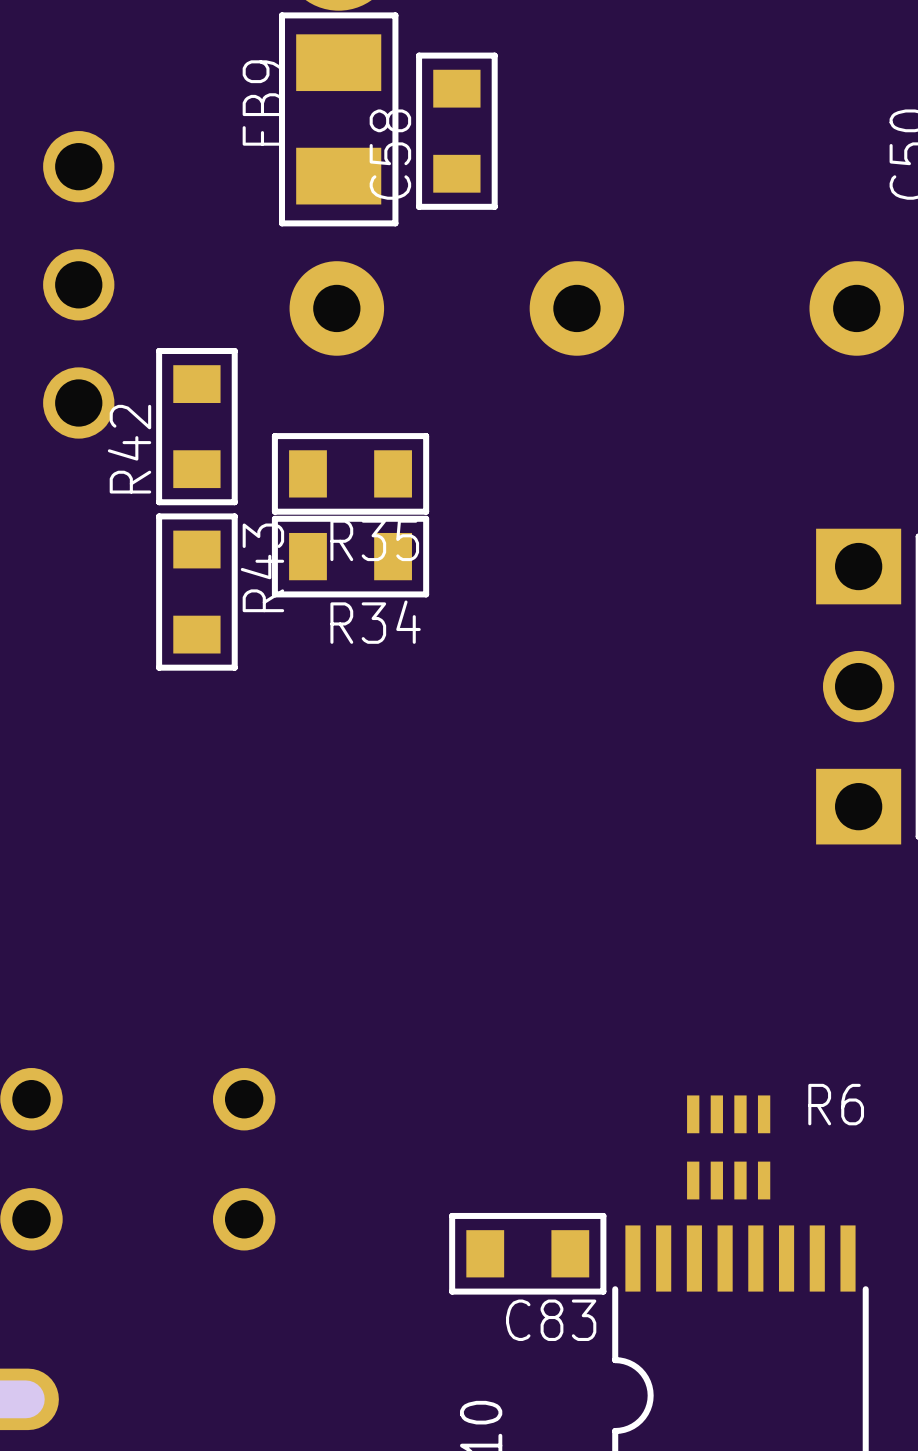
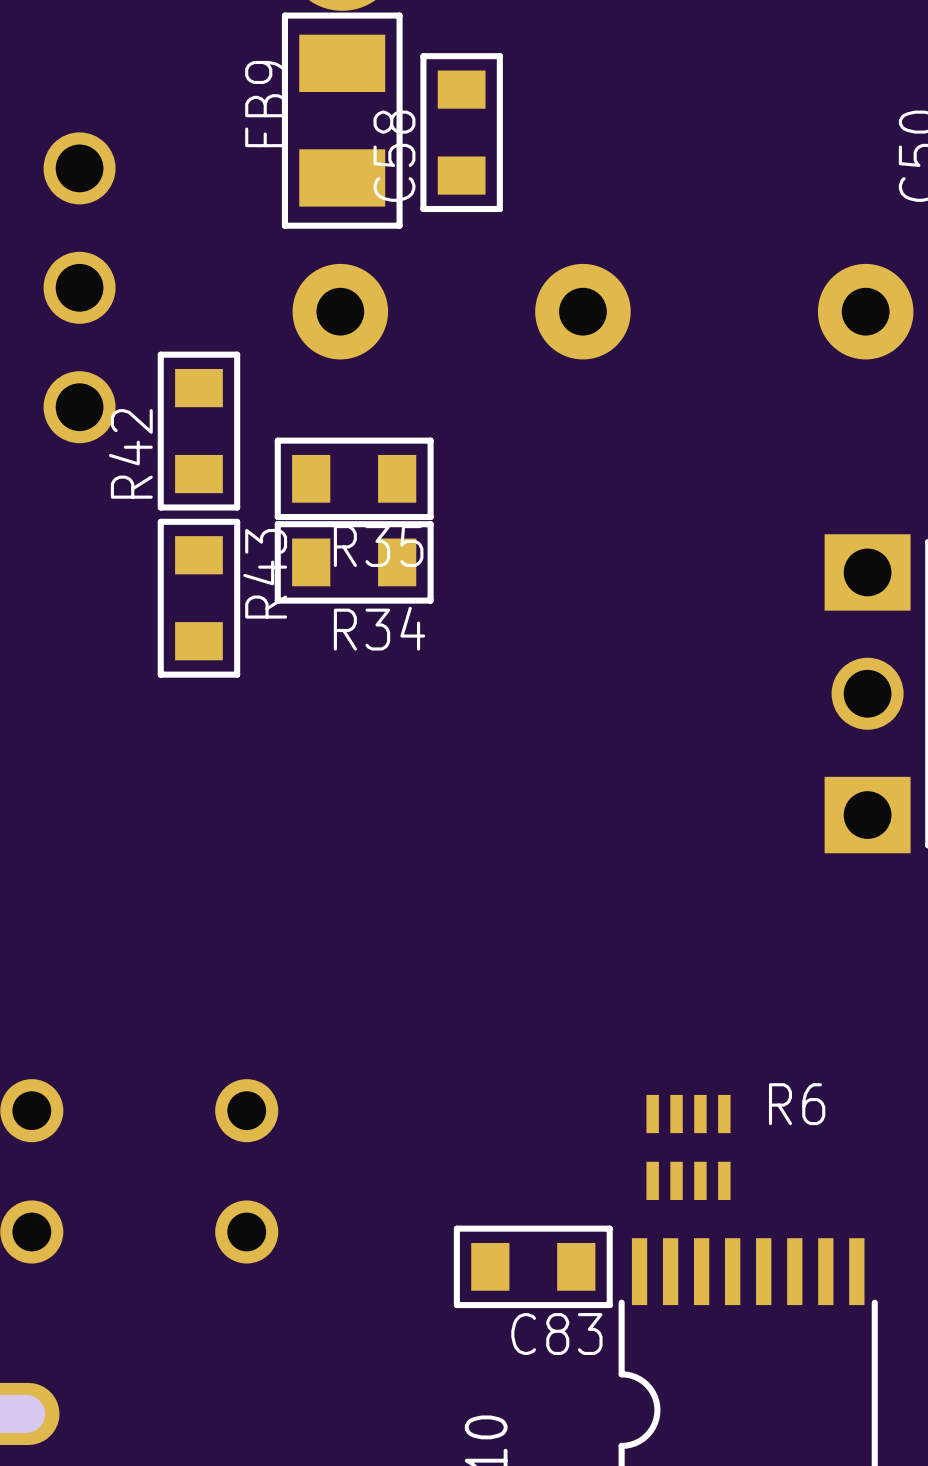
R6 position: (728, 1147) -> (688, 1147)

